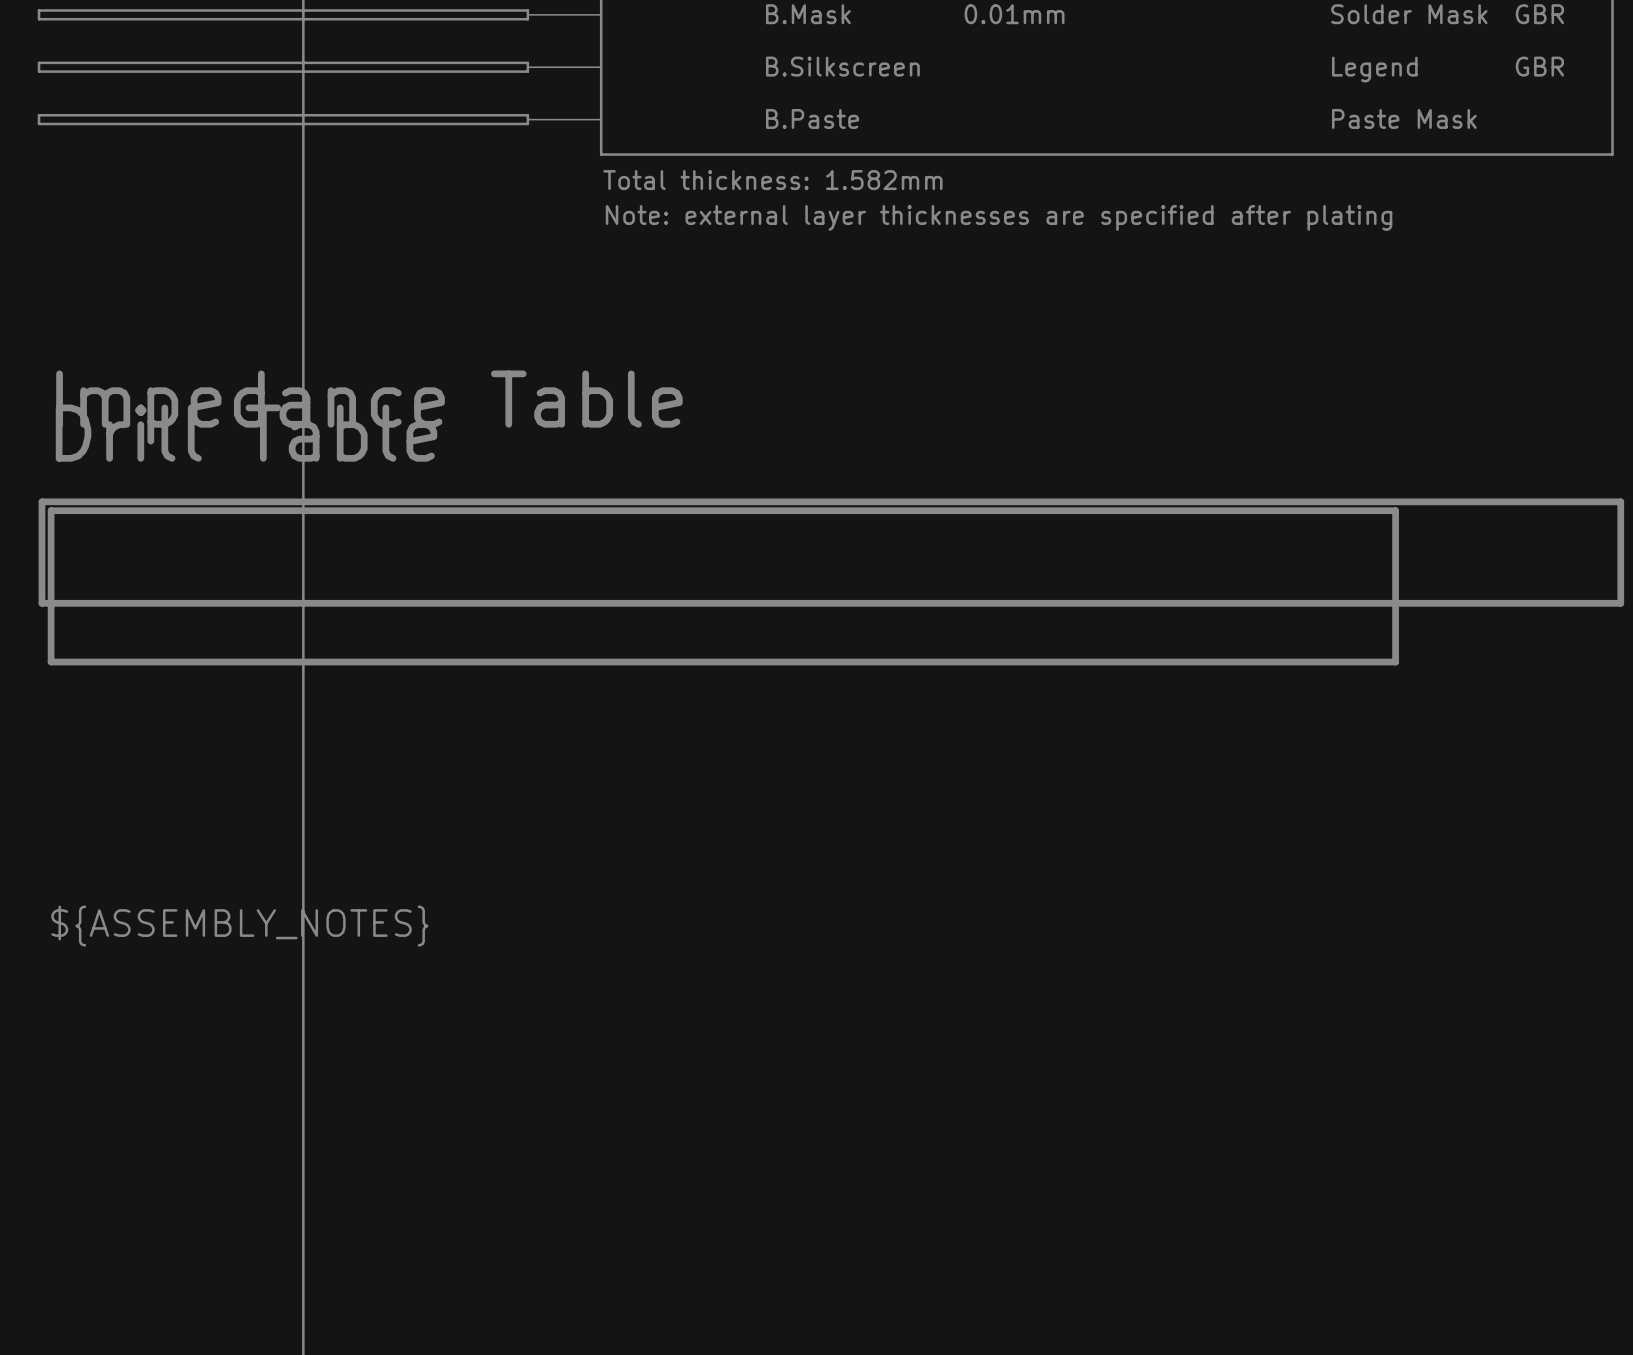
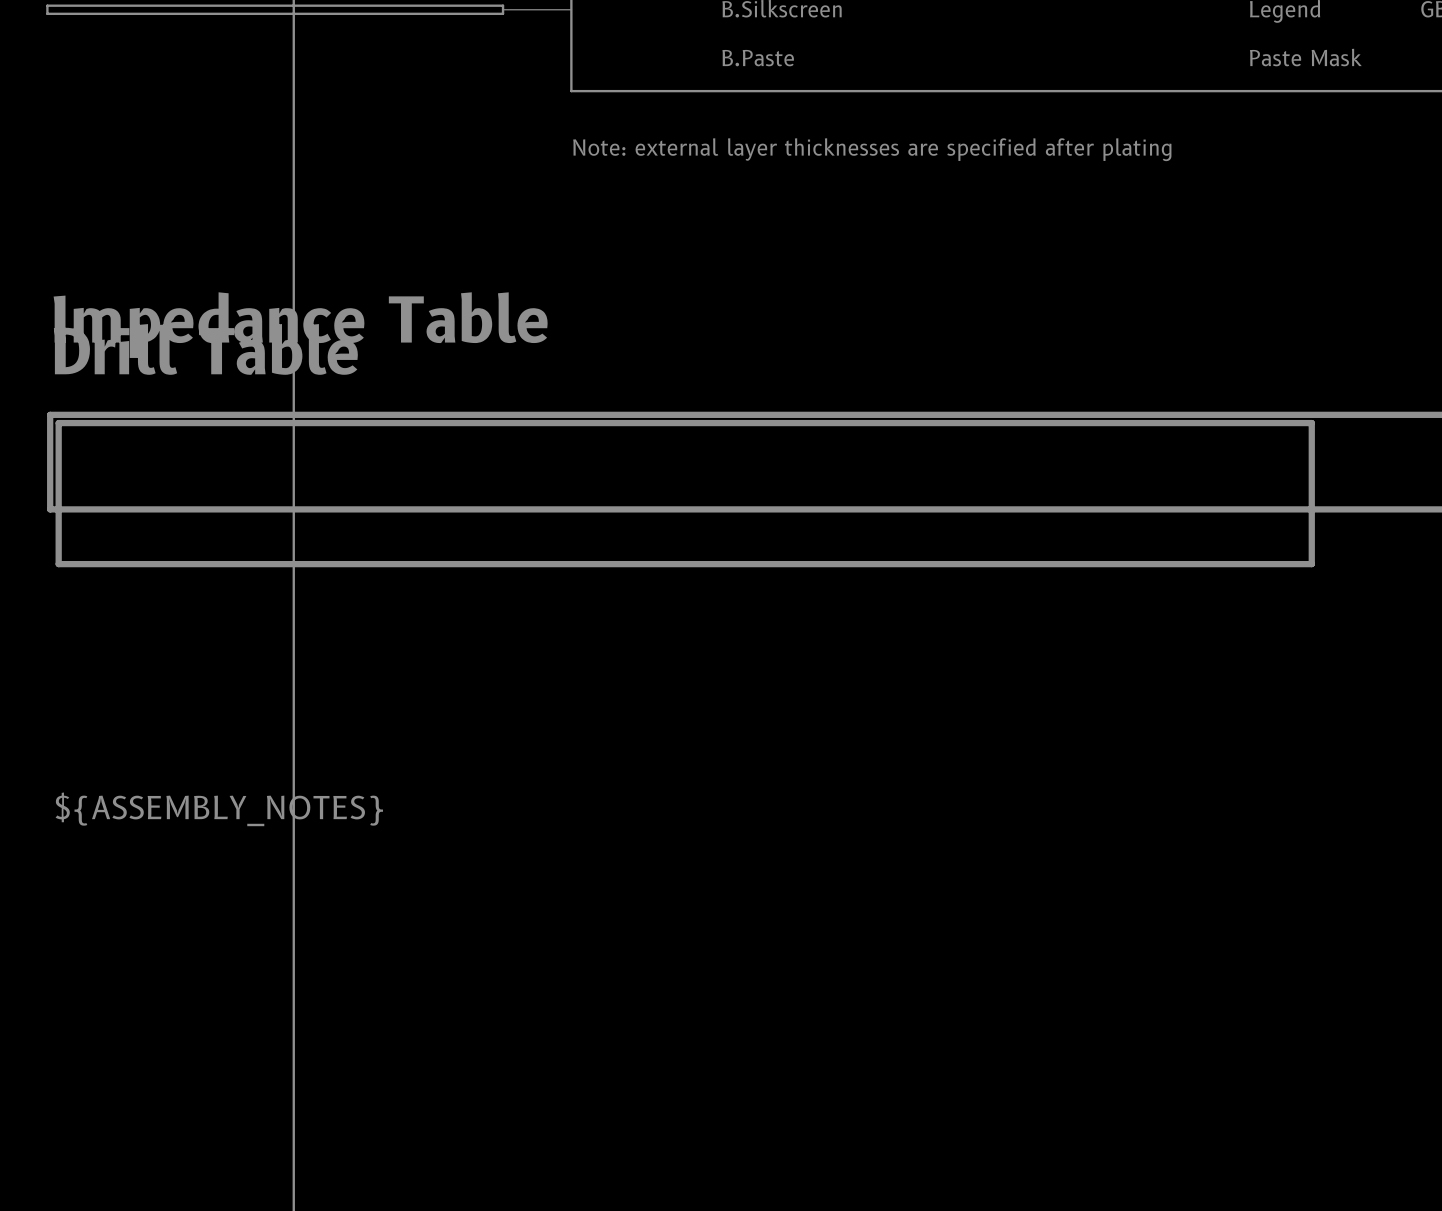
line: (39, 115) (39, 123) (527, 123) (527, 115) (39, 115) -> none
line: (527, 119) (601, 119) -> none
text: Total thickness: 1.582mm (772, 180) -> none

